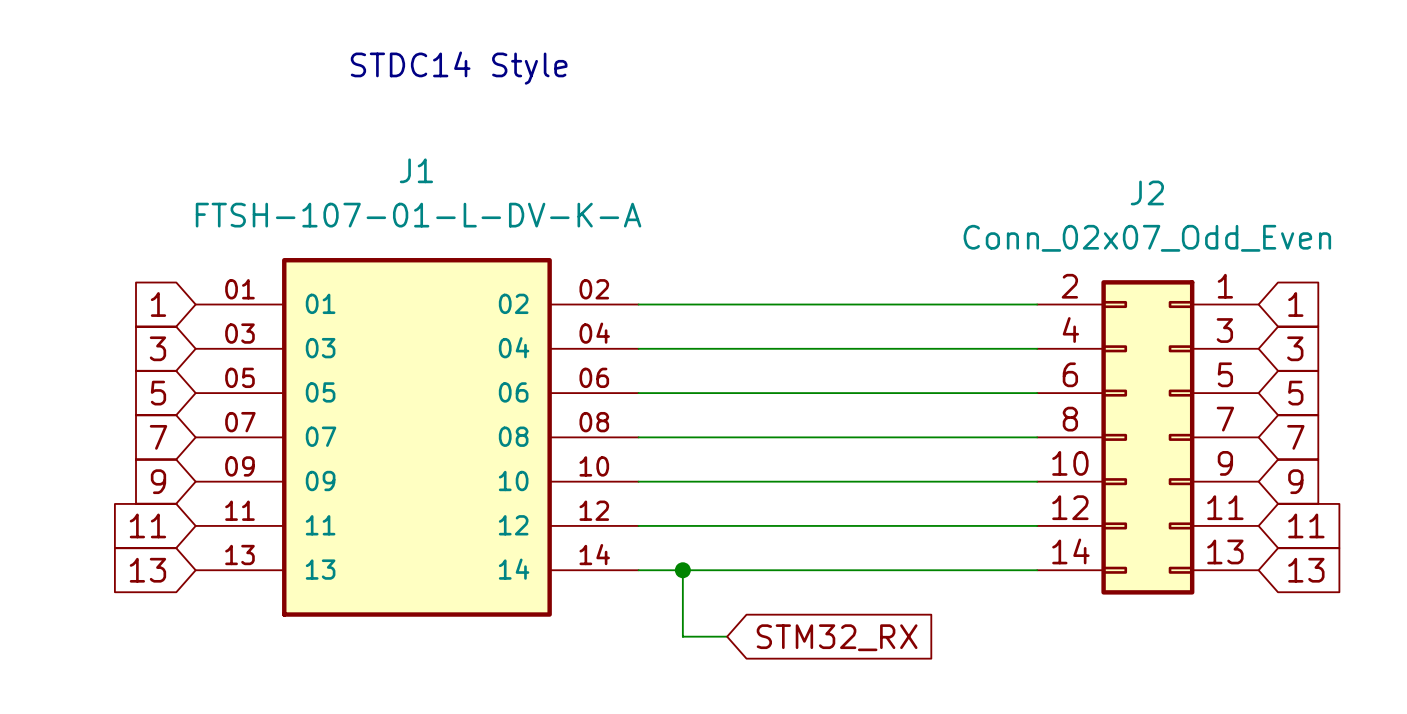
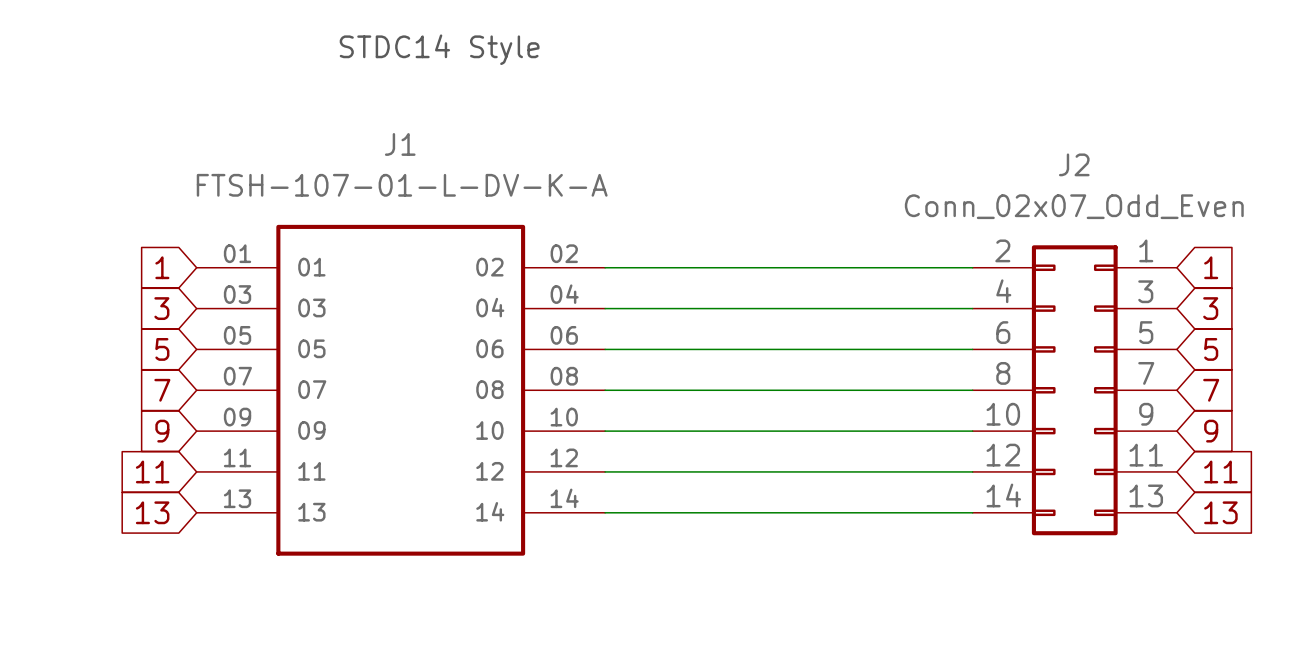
wire: (682, 570) (682, 636) (727, 636) -> none
junction: (682, 570) -> none
global label: STM32_RX (837, 637) -> none

